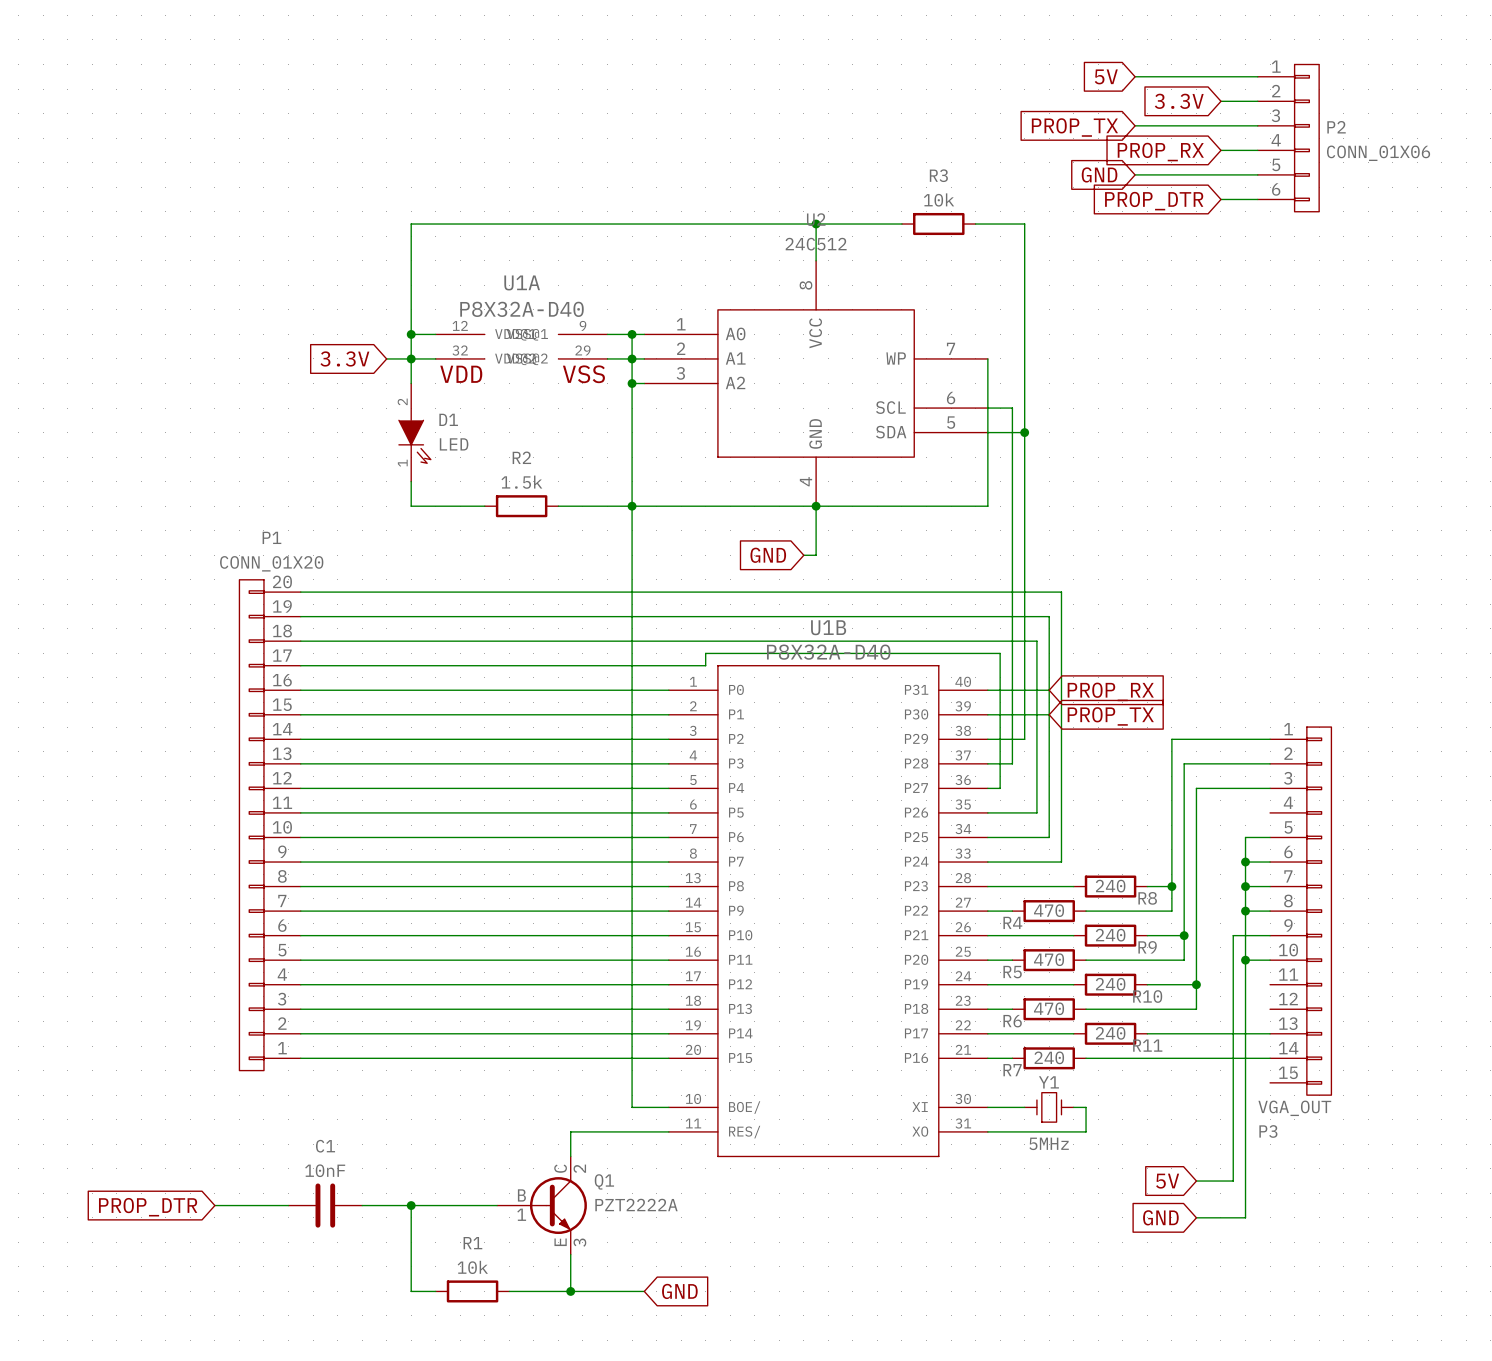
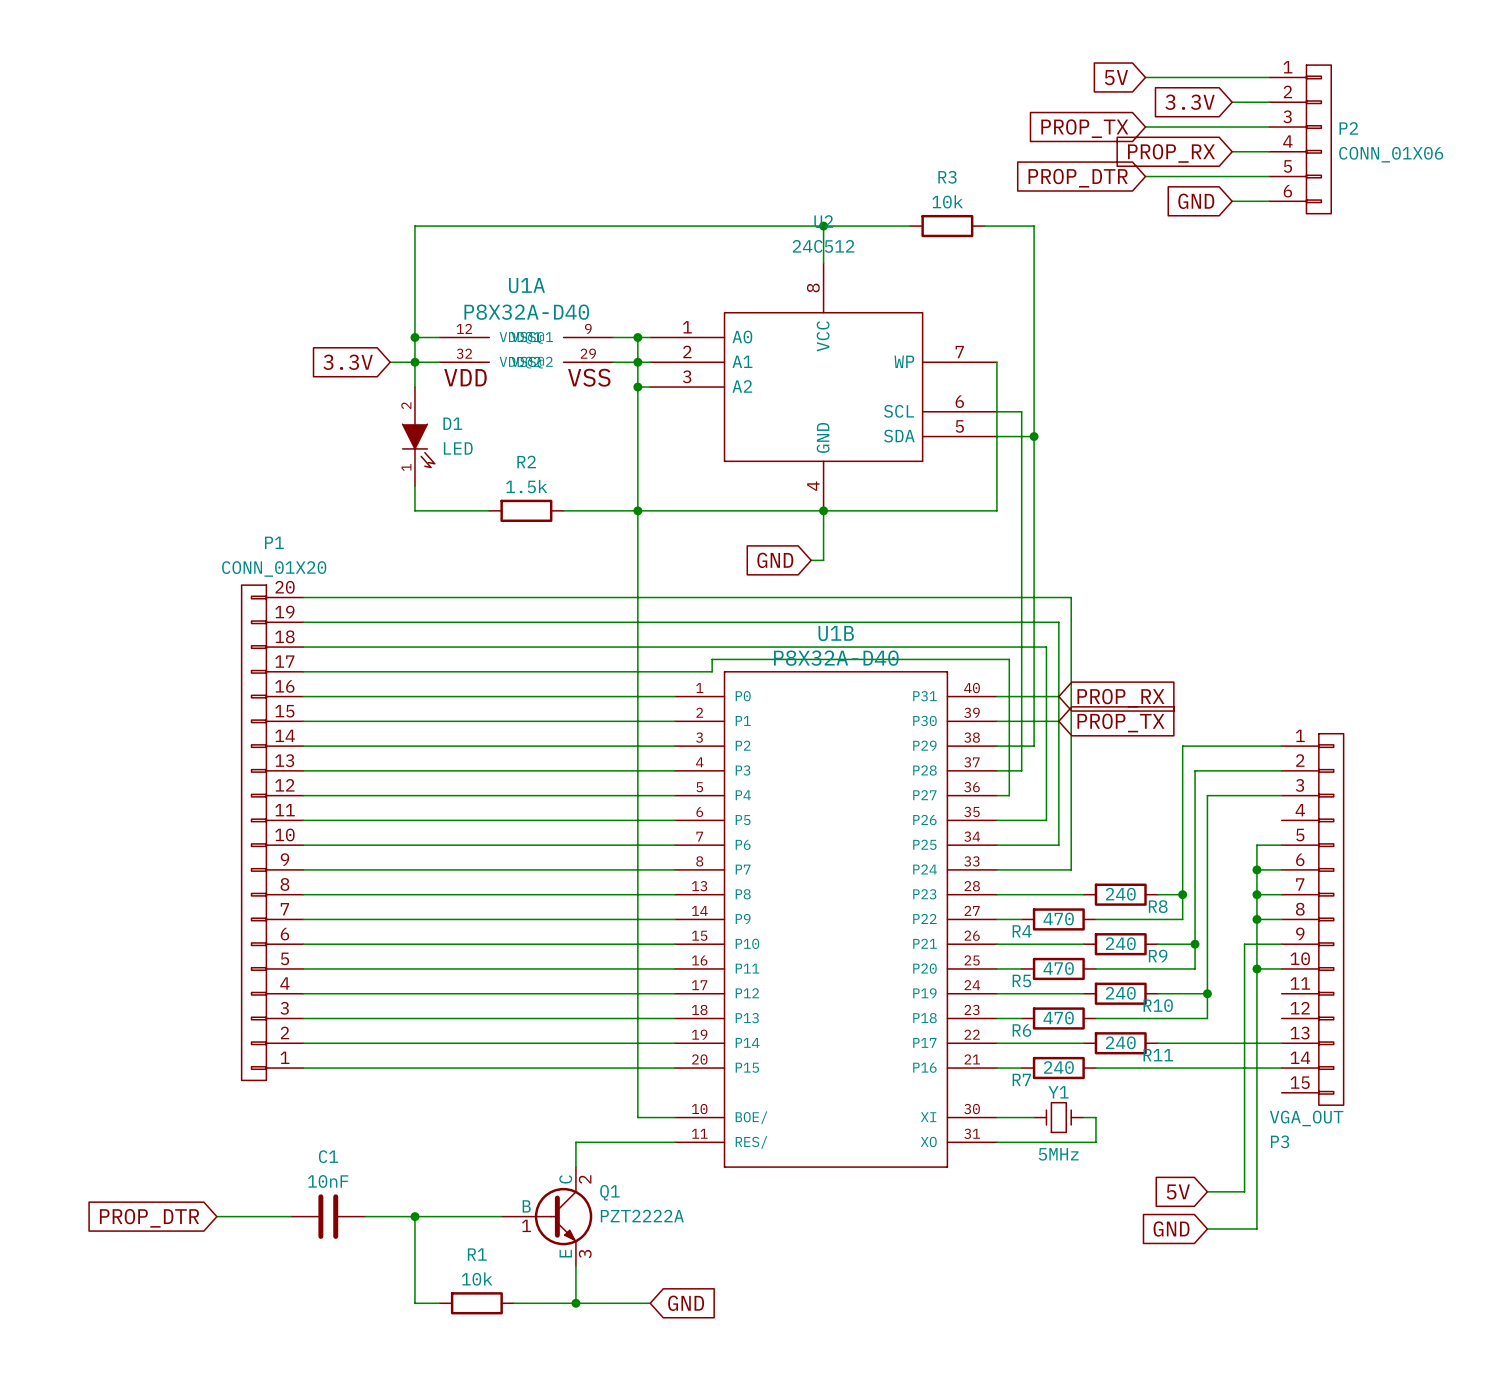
global label: GND (1099, 174) -> PROP_DTR (1078, 178)
global label: PROP_DTR (1154, 201) -> GND (1196, 201)

